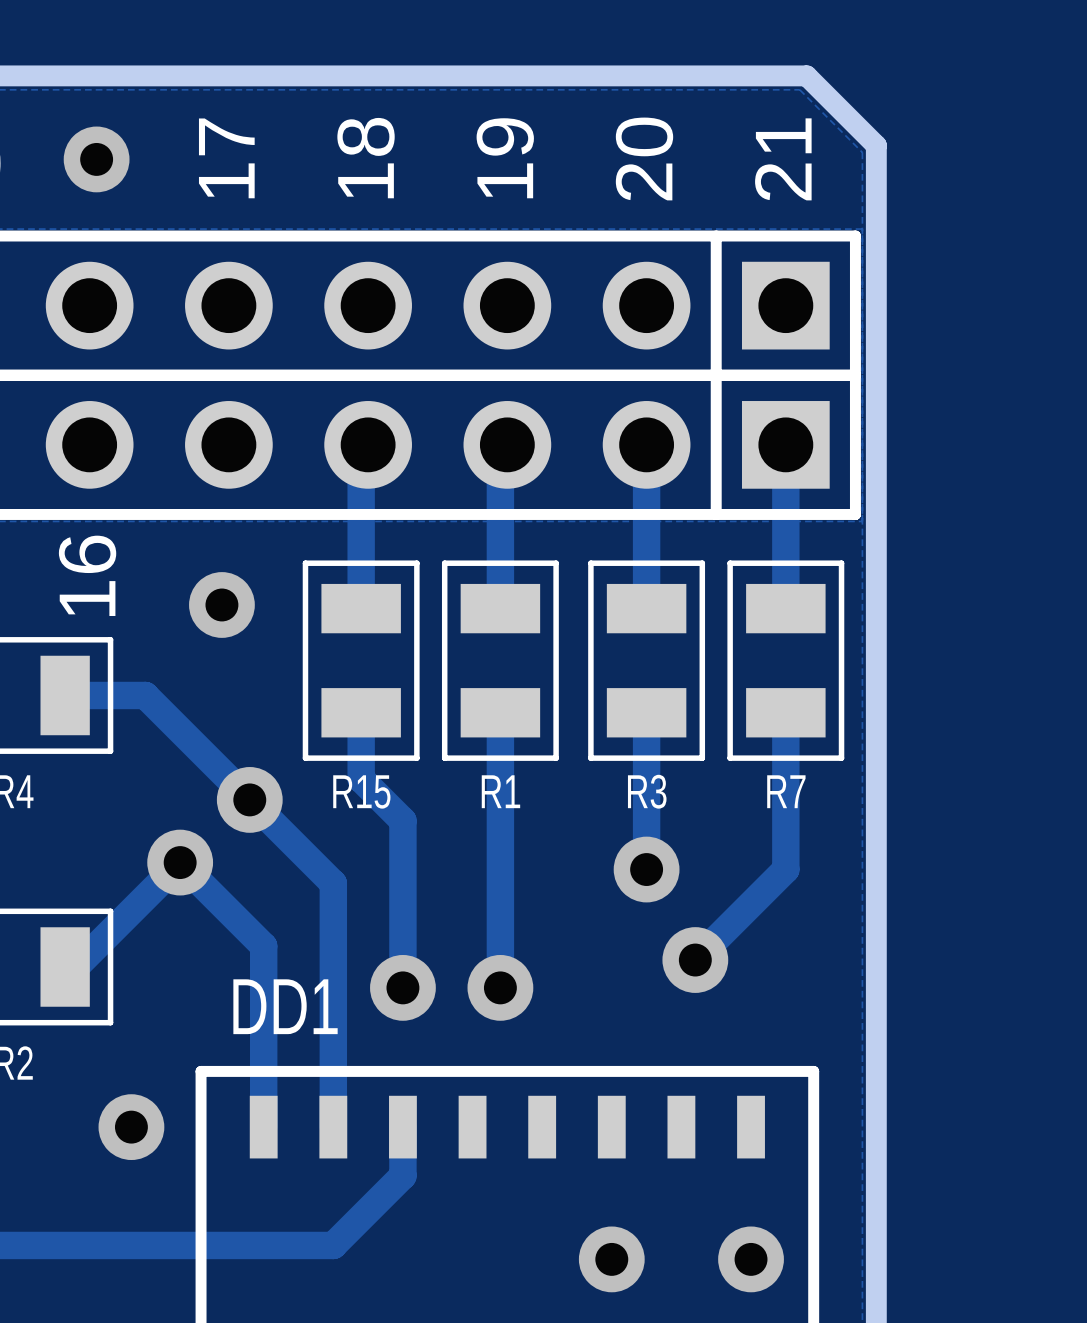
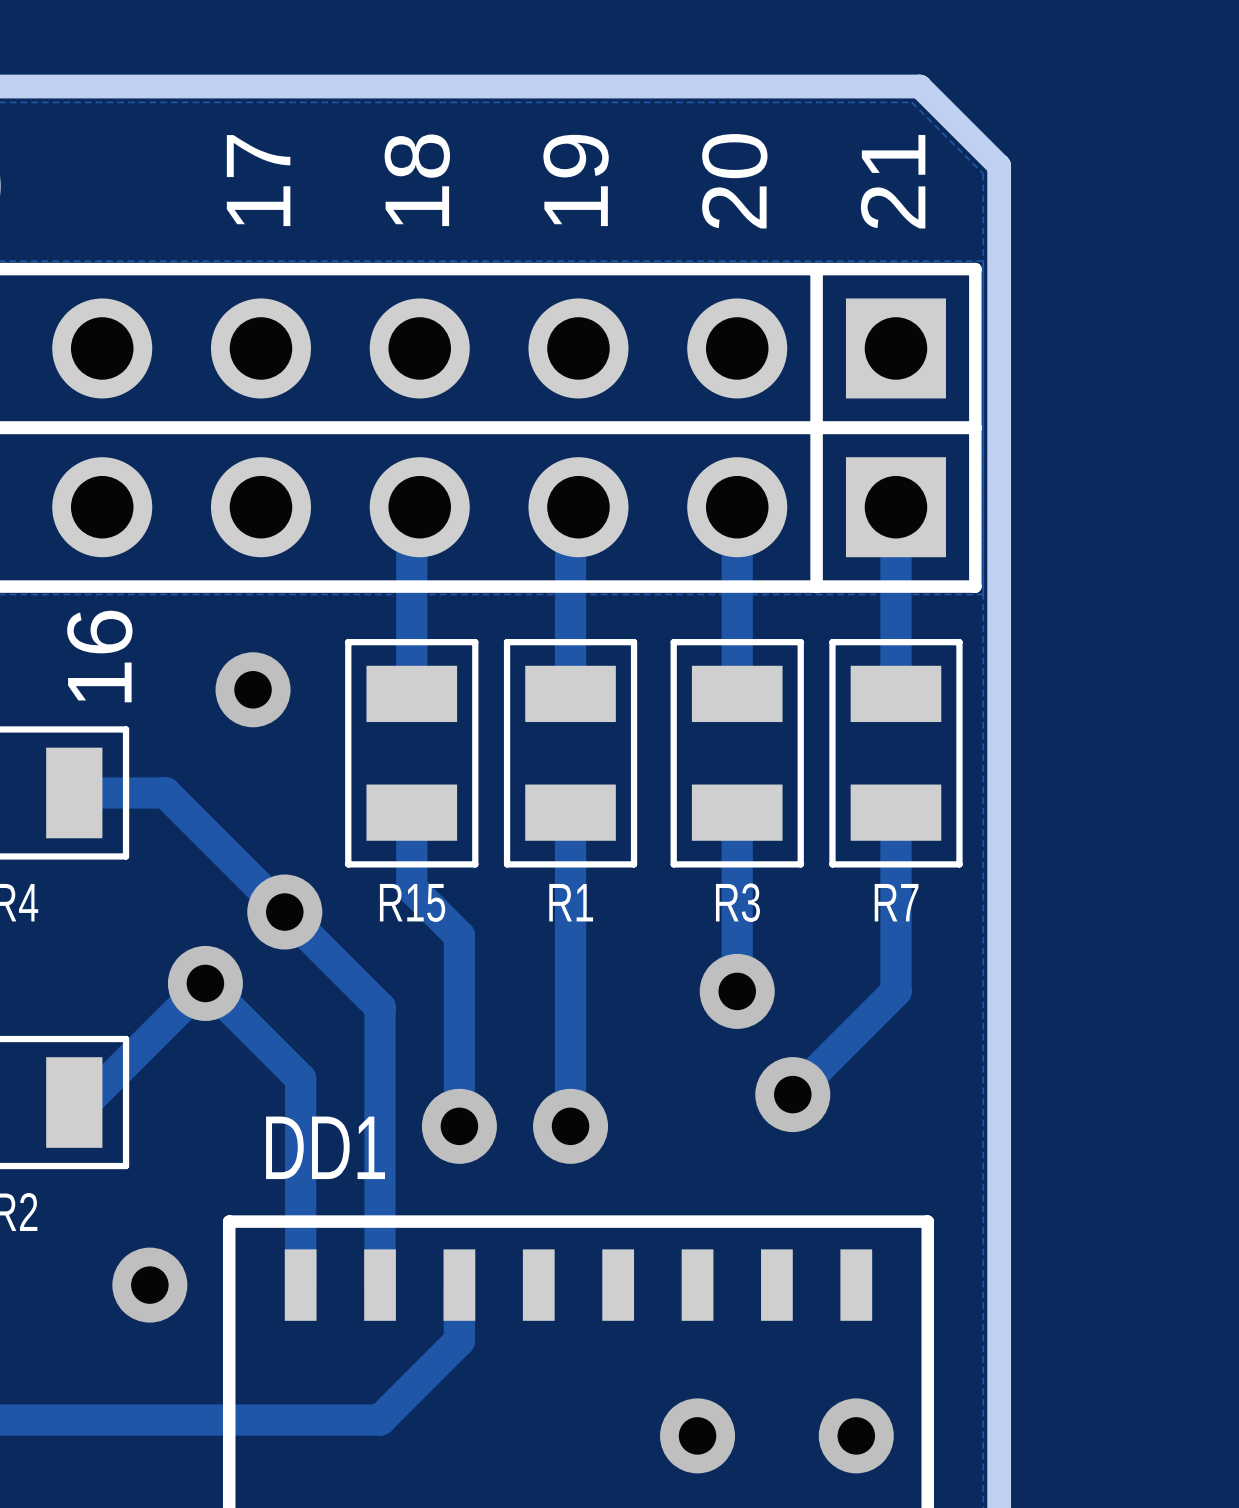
via: (96, 159) -> none

